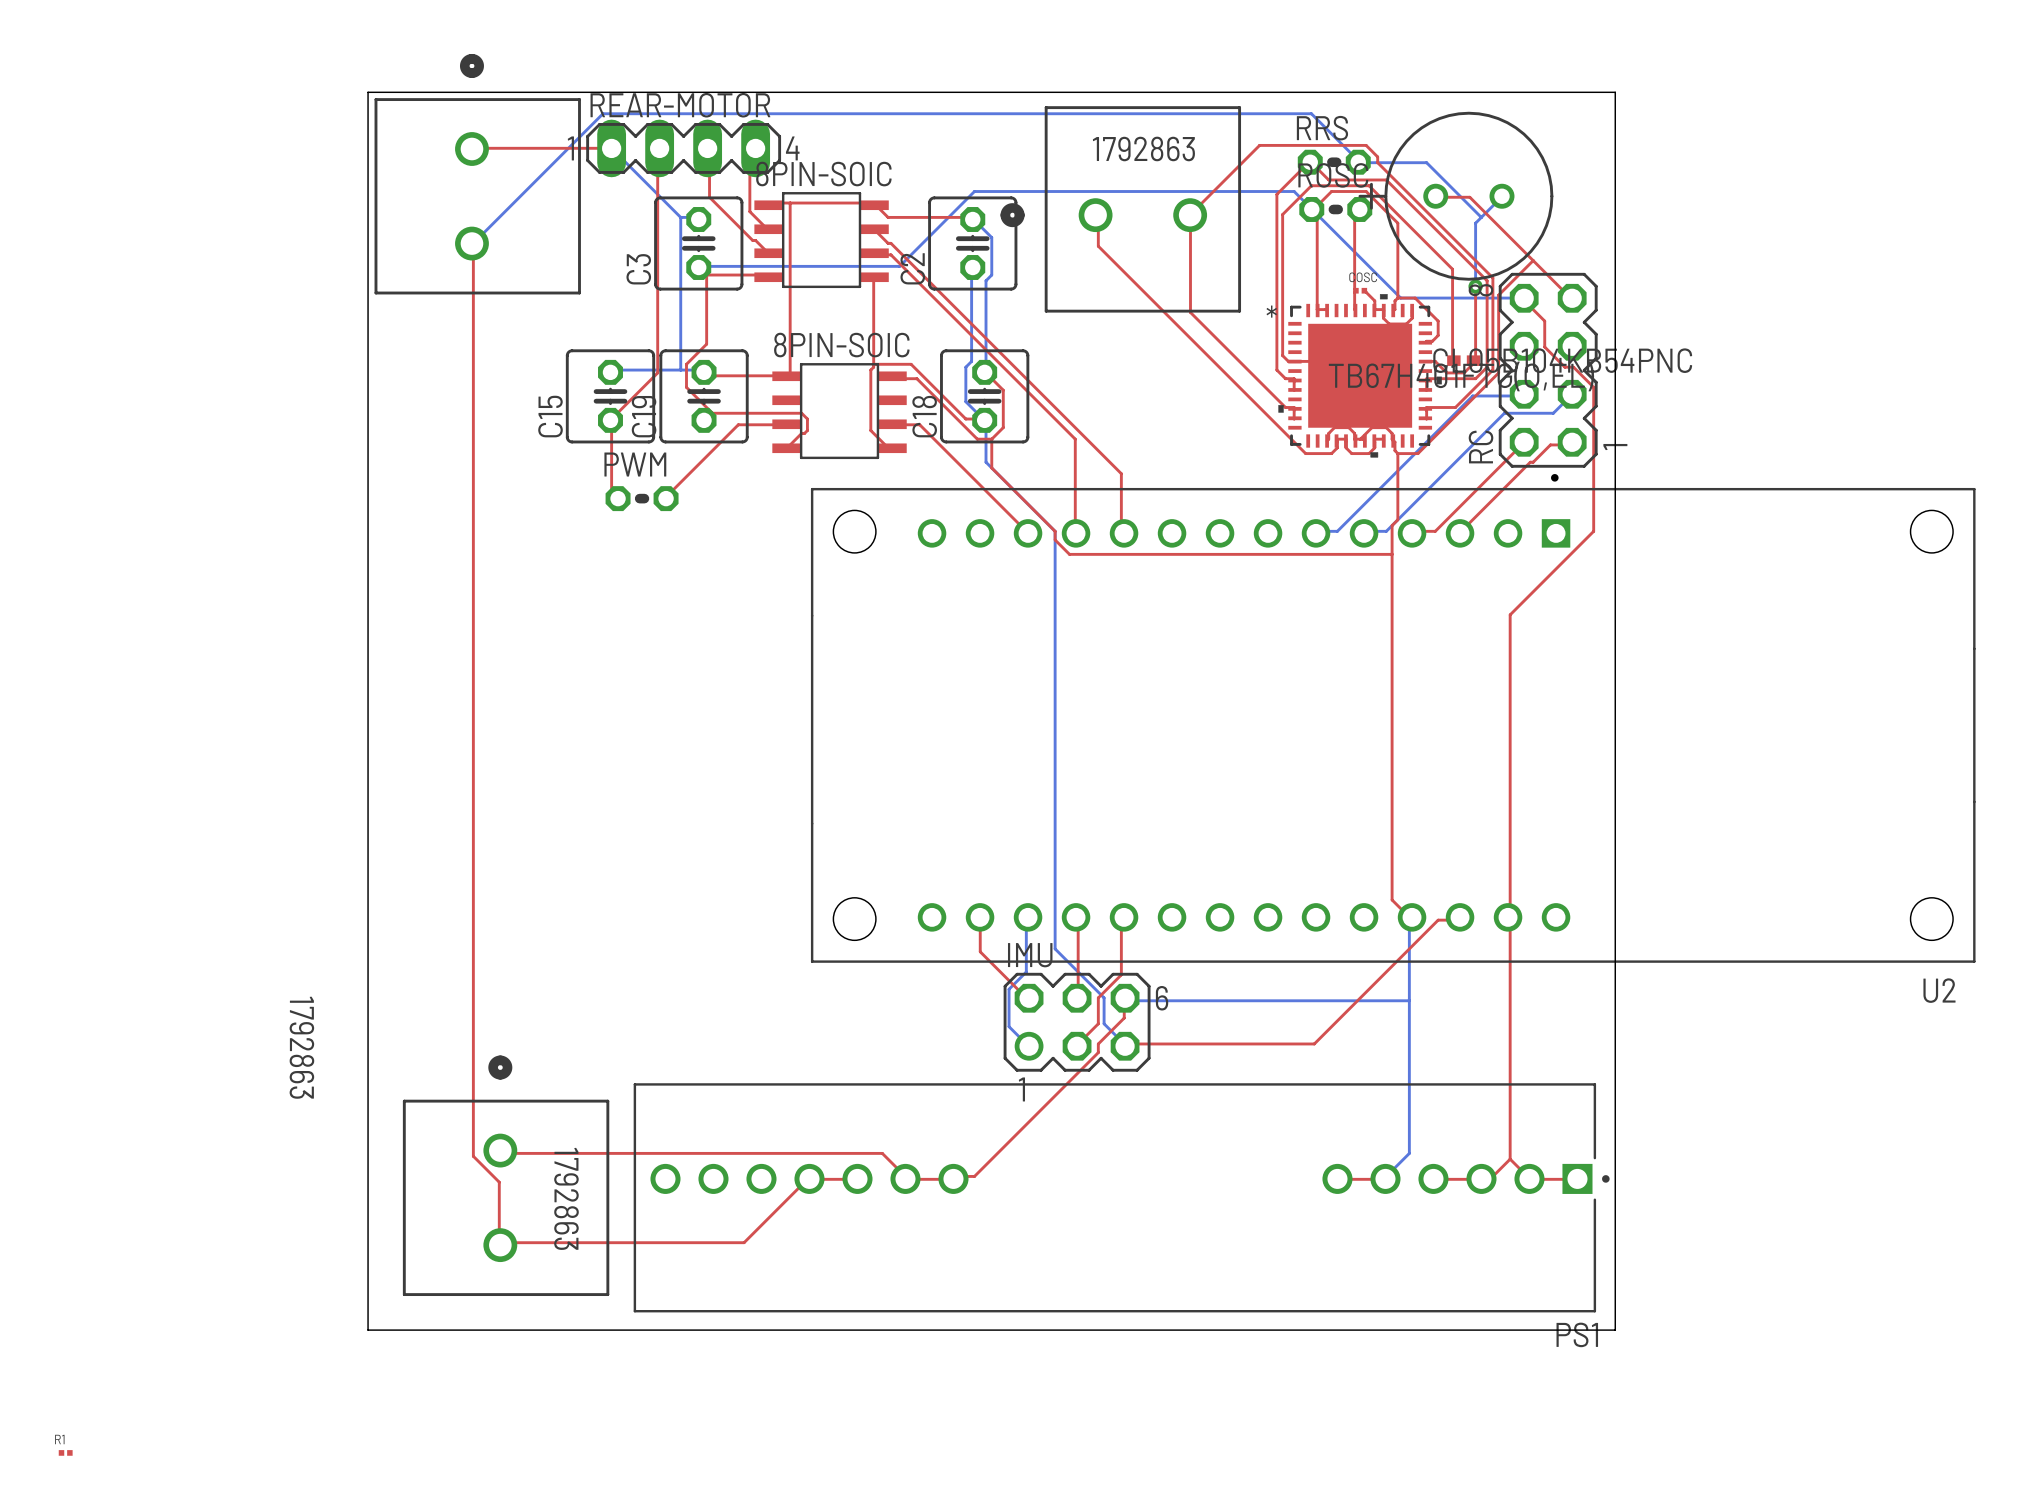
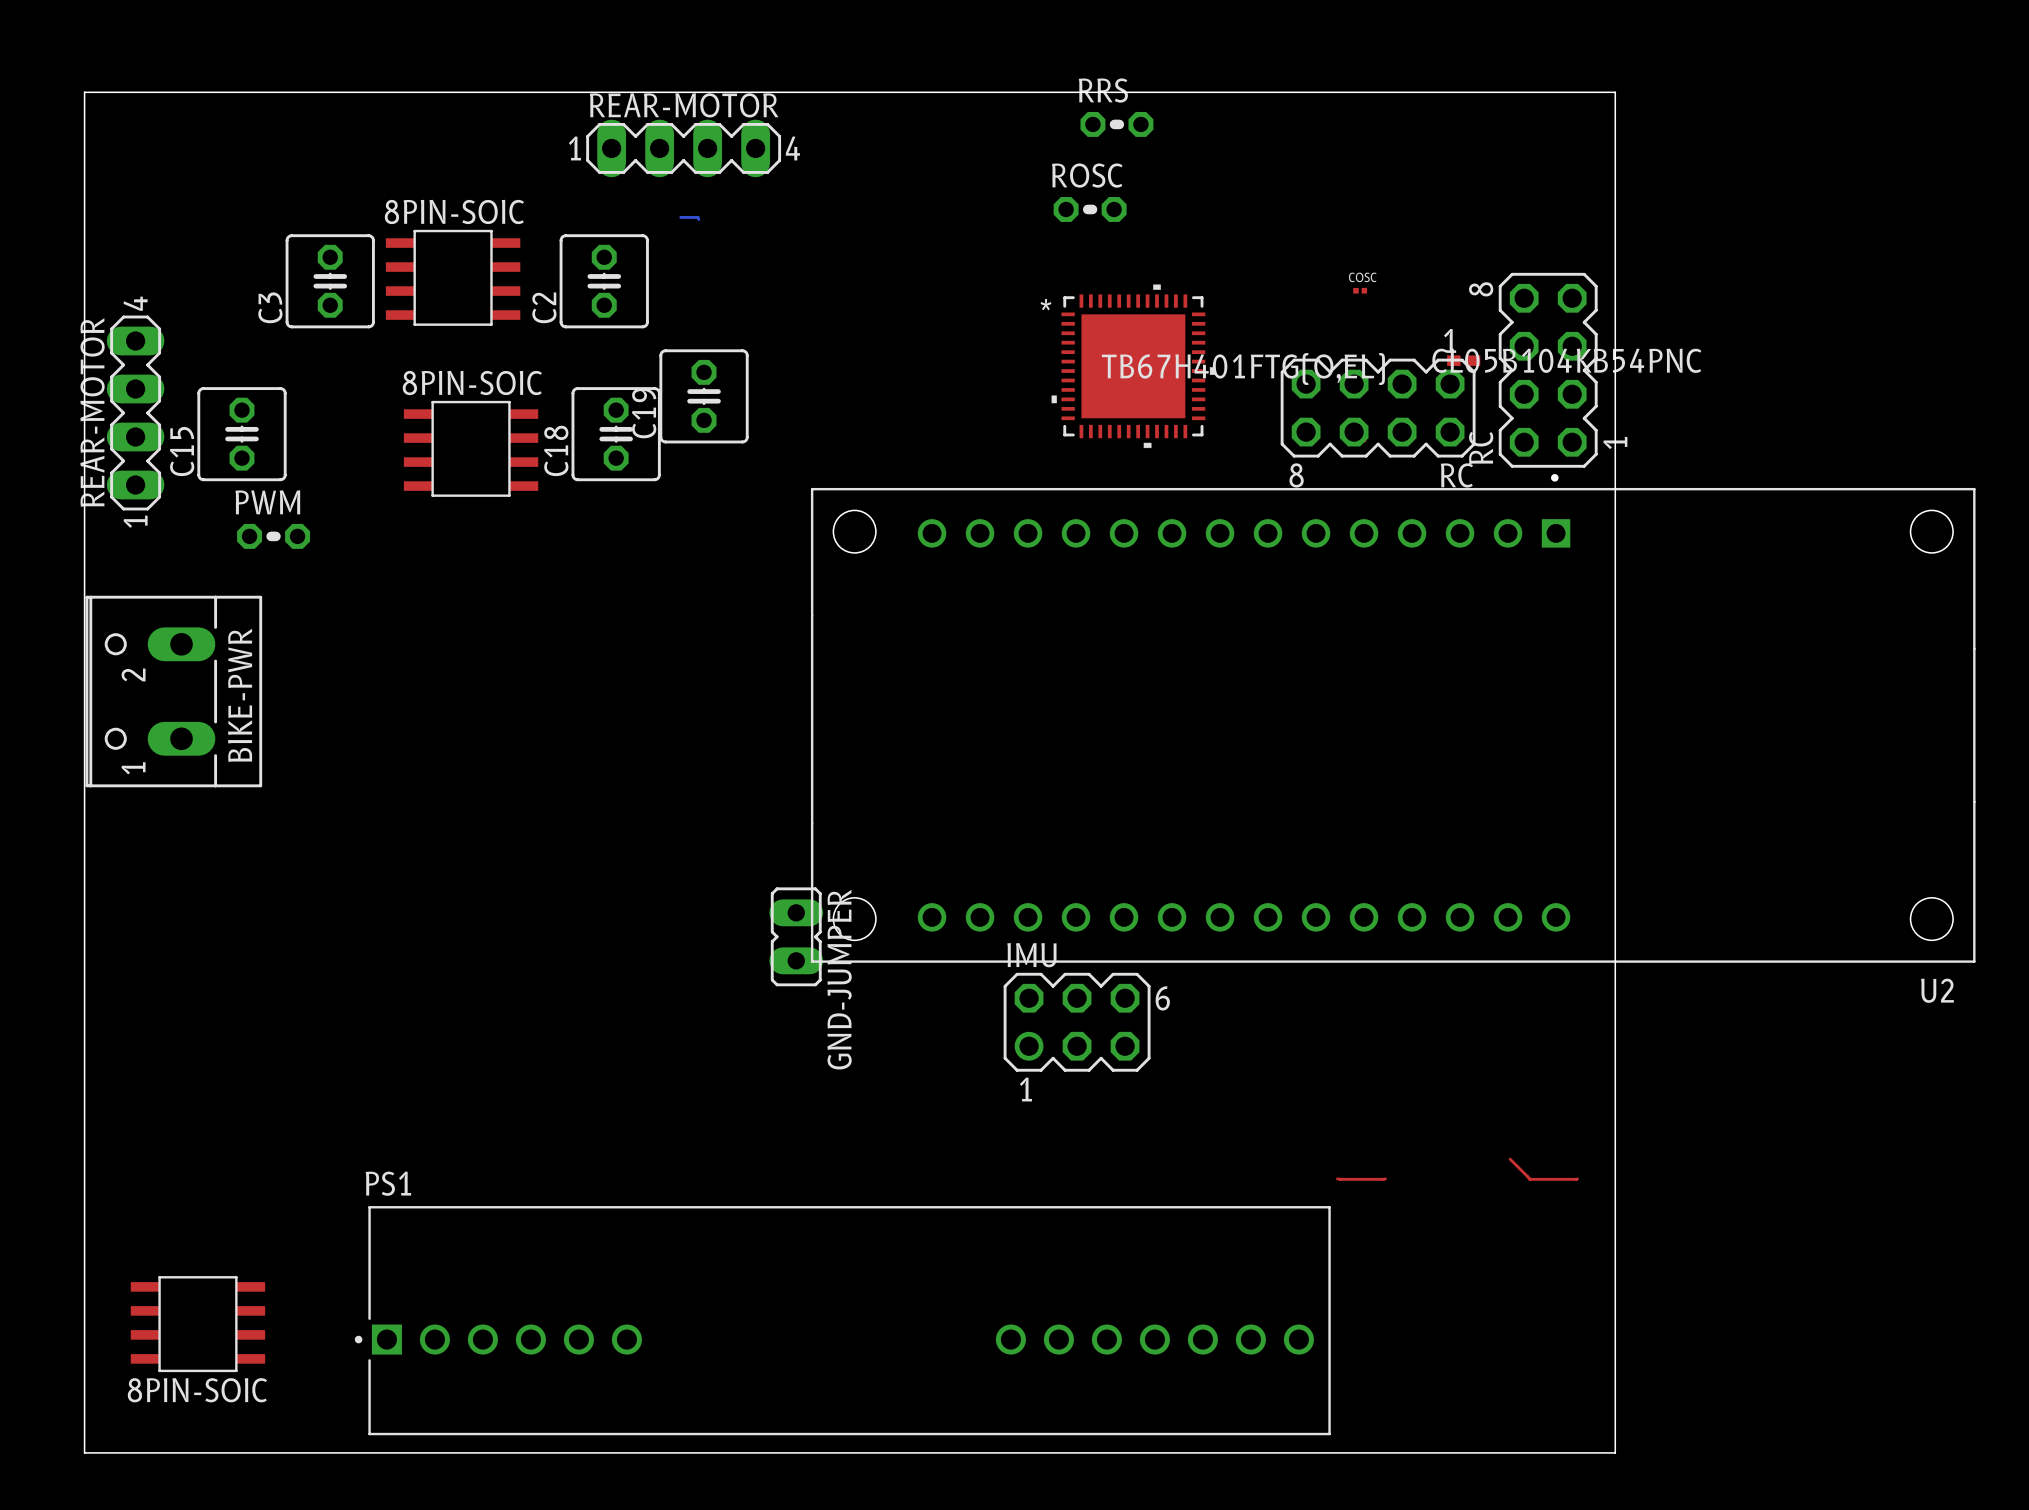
board edge: (368, 92) (368, 1330) (1615, 1330) -> (368, 92) (84, 92) (84, 1452) (1615, 1452) (1615, 1330)
top track: (611, 148) (471, 149) -> none
bottom track: (611, 148) (680, 217) (680, 370) -> none
top track: (659, 148) (657, 151) (657, 372) (610, 420) (611, 491) (618, 498) -> none
top track: (707, 148) (709, 151) (709, 197) (752, 240) (755, 240) (768, 253) -> none
top track: (755, 148) (755, 151) (749, 156) (749, 211) (768, 229) -> none
RRS position: (1334, 162) -> (1116, 124)
part: 1792863 (477, 174) -> none
top track: (1435, 196) (1469, 197) (1572, 298) -> none
part: (1455, 196) -> none
bottom track: (1501, 196) (1475, 223) (1475, 286) -> none
top track: (790, 203) (790, 372) (786, 376) (709, 375) (704, 372) -> none
top track: (768, 205) (770, 203) (873, 203) (888, 217) (971, 217) (972, 219) -> none
part: 1792863 (1120, 209) -> none
ROSC position: (1335, 209) -> (1090, 209)
top track: (1359, 209) (1354, 214) (1355, 310) -> none
top track: (1095, 215) (1098, 217) (1098, 246) (1305, 453) (1331, 453) (1337, 447) (1337, 439) (1346, 439) (1346, 447) (1351, 453) (1369, 453) (1374, 447) (1374, 439) (1383, 439) (1383, 441) -> none
bottom track: (1481, 217) (1426, 162) (1358, 162) (1311, 113) (602, 113) (471, 243) -> none
bottom track: (972, 219) (991, 237) (991, 275) (986, 280) (984, 372) -> none
top track: (874, 229) (888, 243) (890, 243) (1121, 473) (1121, 531) (1124, 533) -> none
part: (821, 240) -> none
top track: (471, 243) (473, 1156) (499, 1182) (499, 1242) (500, 1245) (502, 1242) (744, 1242) (807, 1179) (857, 1178) -> none
C3 position: (698, 243) -> (330, 281)
C2 position: (972, 243) -> (604, 281)
top track: (874, 253) (890, 254) (1075, 439) (1076, 533) -> none
top track: (1533, 260) (1498, 295) (1498, 372) (1418, 453) (1397, 453) -> none
bottom track: (698, 267) (899, 266) (974, 191) (1294, 191) (1400, 298) (1524, 298) -> none
bottom track: (972, 267) (971, 361) (965, 367) (965, 401) (986, 421) (986, 462) (1055, 531) (1055, 948) (1104, 997) (1104, 1023) (1125, 1046) -> none
top track: (706, 275) (767, 275) (768, 277) -> none
top track: (706, 275) (706, 344) (686, 364) (686, 387) (712, 413) -> none
part: none -> (453, 277)
top track: (874, 277) (870, 430) (890, 450) (892, 448) -> none
top track: (1475, 286) (1475, 358) (1473, 360) (1475, 361) (1464, 372) (1446, 372) (1435, 361) (1425, 361) -> none
via: (1475, 286) -> none
top track: (1364, 290) (1374, 300) (1374, 309) -> none
top track: (1397, 298) (1397, 223) (1366, 191) (1331, 191) (1311, 209) (1317, 214) (1317, 309) -> none
top track: (1397, 298) (1415, 298) (1438, 321) (1438, 335) (1432, 341) (1425, 342) -> none
top track: (1397, 298) (1394, 300) (1394, 309) (1393, 310) -> none
top track: (1524, 298) (1544, 321) (1544, 347) (1564, 367) (1573, 367) (1593, 387) (1593, 531) (1510, 614) (1510, 917) (1508, 917) (1510, 920) (1510, 1159) (1492, 1176) (1484, 1176) (1481, 1179) (1433, 1178) -> none
top track: (1317, 309) (1327, 310) -> none
top track: (1374, 309) (1383, 309) (1383, 318) (1389, 323) -> none
top track: (1412, 310) (1412, 318) (1406, 323) (1389, 323) -> none
top track: (1453, 360) (1452, 269) (1369, 185) (1311, 185) (1282, 214) (1282, 355) (1288, 361) (1346, 361) (1360, 375) -> none
top track: (873, 364) (911, 364) (965, 419) (984, 420) -> none
bottom track: (610, 372) (611, 370) (703, 370) (704, 372) -> none
top track: (984, 372) (1003, 390) (1003, 427) (991, 439) -> none
part position: (1360, 375) -> (1133, 366)
top track: (892, 376) (893, 378) (916, 378) (977, 439) (991, 439) -> none
top track: (1294, 389) (1294, 378) (1285, 378) (1276, 370) (1276, 194) (1310, 162) (1328, 179) (1386, 179) (1487, 280) (1487, 367) (1475, 378) (1426, 378) (1425, 389) -> none
bottom track: (1524, 394) (1521, 395) (1472, 395) (1337, 531) (1317, 531) (1316, 533) -> none
bottom track: (1572, 394) (1553, 413) (1504, 413) (1386, 531) (1366, 531) (1364, 533) -> none
C15 position: (610, 396) -> (241, 434)
C18 position: (984, 396) -> (616, 434)
RC: none -> (1378, 408)
part: (839, 411) -> none
REAR-MOTOR: none -> (135, 413)
top track: (712, 413) (801, 413) (807, 419) (807, 430) (801, 433) (786, 448) -> none
top track: (1294, 418) (1294, 407) (1285, 407) (1190, 312) (1190, 215) (1259, 145) (1366, 145) (1377, 156) (1377, 162) (1492, 277) (1492, 370) (1455, 407) (1426, 407) (1425, 418) -> none
top track: (786, 424) (738, 424) (666, 498) -> none
top track: (892, 424) (919, 424) (1028, 533) -> none
top track: (1348, 427) (1334, 427) (1328, 433) (1327, 441) -> none
top track: (1348, 427) (1354, 433) (1355, 441) -> none
top track: (991, 439) (991, 467) (1055, 531) (1055, 539) (1069, 554) (1392, 554) -> none
top track: (1360, 439) (1371, 427) (1386, 427) (1392, 433) (1394, 450) (1397, 453) -> none
top track: (1524, 442) (1435, 531) (1412, 531) (1412, 533) -> none
top track: (1572, 442) (1570, 444) (1550, 444) (1533, 462) (1530, 462) (1460, 533) -> none
part: none -> (471, 448)
top track: (1397, 453) (1397, 519) (1392, 525) (1392, 899) (1409, 917) (1412, 917) -> none
PWM position: (642, 498) -> (273, 536)
BIKE-PWR: none -> (173, 691)
top track: (980, 917) (980, 951) (1026, 997) (1029, 998) -> none
bottom track: (1028, 917) (1026, 920) (1026, 971) (1009, 989) (1009, 1026) (1029, 1046) -> none
top track: (1076, 917) (1078, 920) (1077, 998) -> none
top track: (1124, 917) (1121, 920) (1121, 974) (1098, 997) (1098, 1023) (1077, 1046) -> none
bottom track: (1412, 917) (1409, 920) (1409, 1153) (1385, 1178) -> none
top track: (1460, 917) (1458, 920) (1438, 920) (1314, 1043) (1127, 1043) (1125, 1046) -> none
GND-JUMPER: none -> (796, 936)
top track: (1125, 998) (1124, 1018) (1098, 1043) (1098, 1052) (974, 1176) (954, 1176) (951, 1179) (905, 1178) (905, 1176) (882, 1153) (502, 1153) (500, 1150) -> none
bottom track: (1125, 998) (1127, 1000) (1409, 1000) -> none
part: 1792863 (506, 1175) -> none
PS1 rotation: 0° (1121, 1197) -> 180° (842, 1320)
part: none -> (197, 1324)
R1: (65, 1452) -> none

